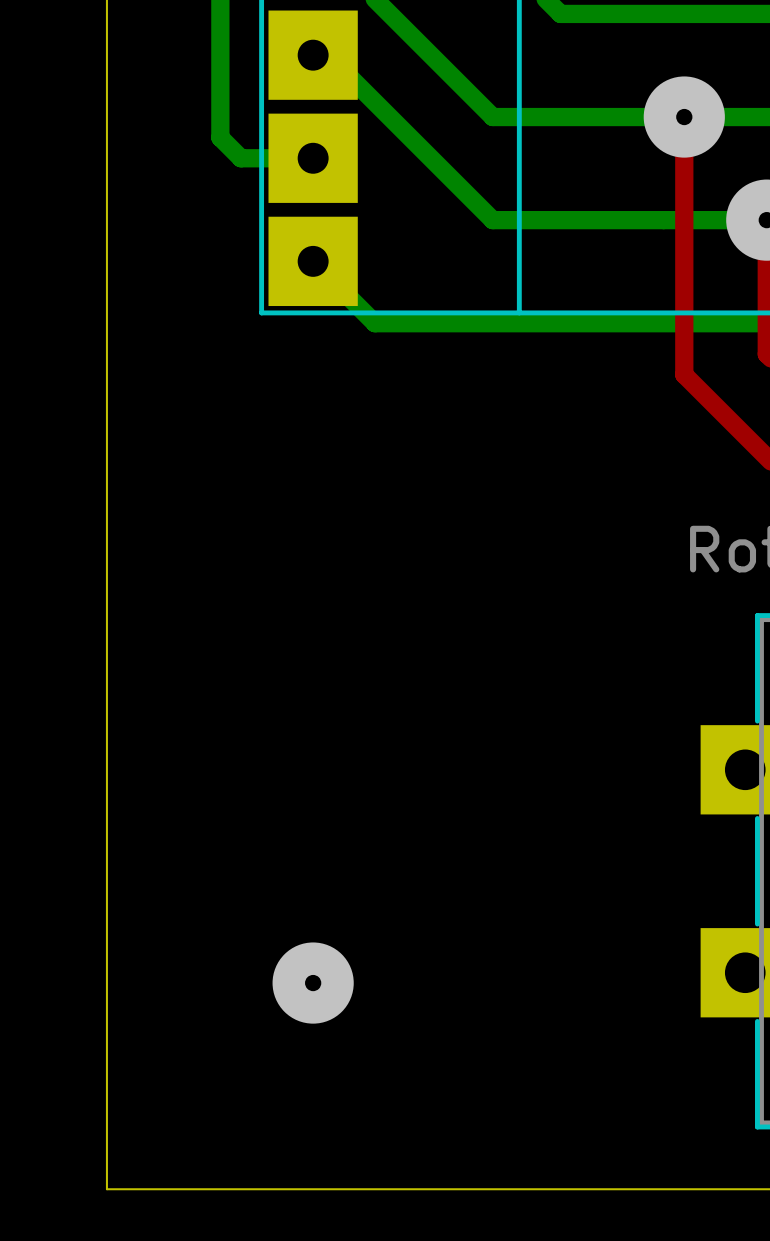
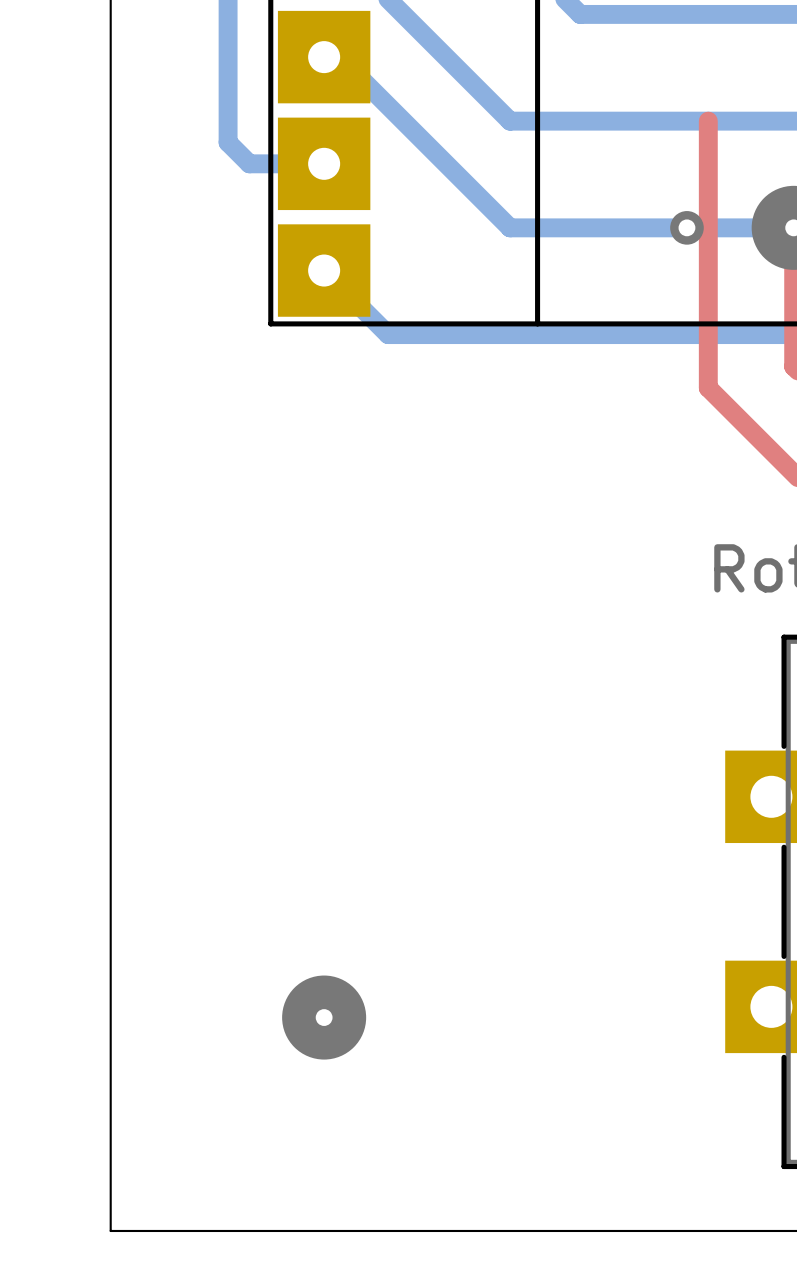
via: (684, 117) -> none
via: none -> (686, 227)

